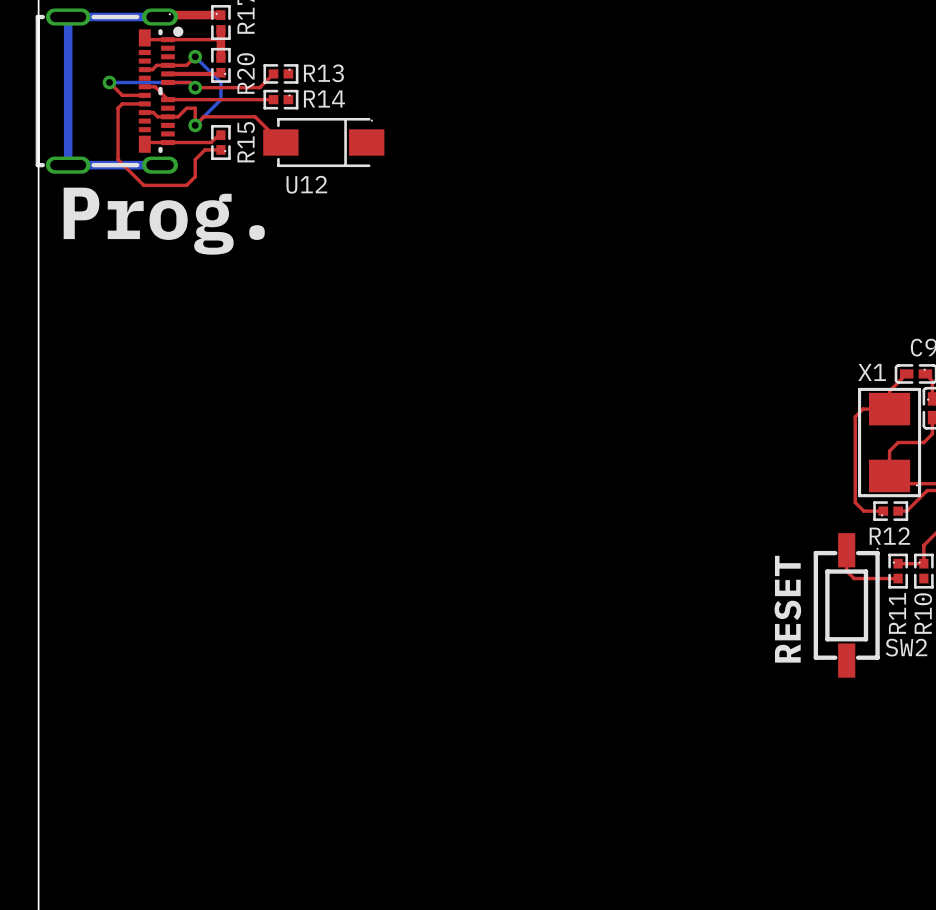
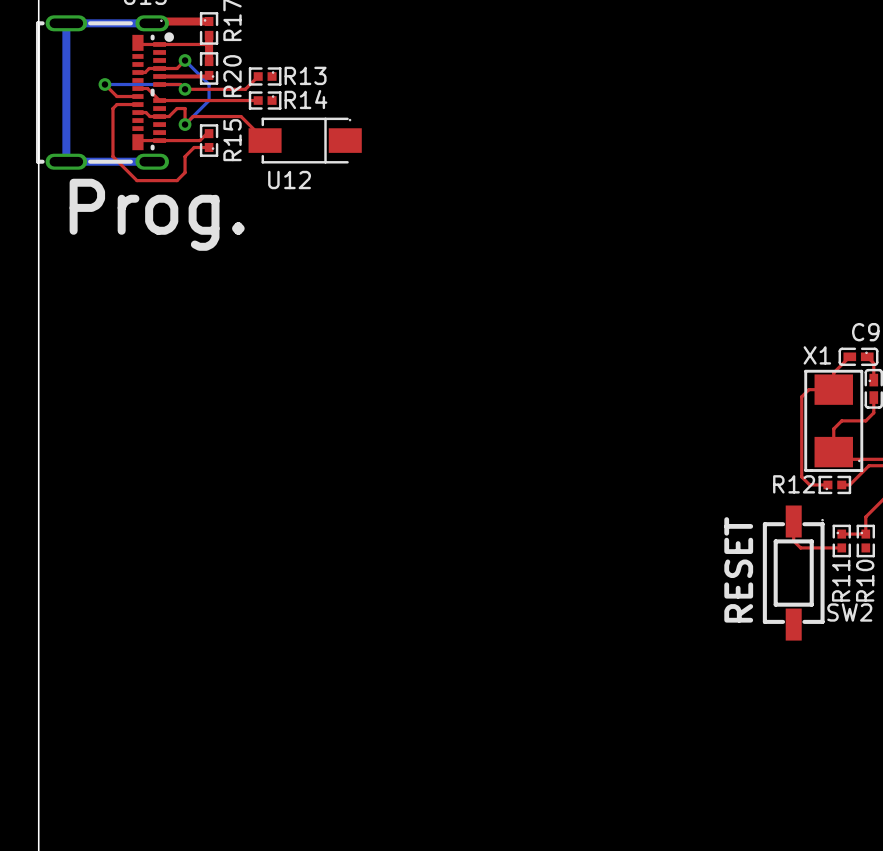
R12 name position: R12 (889, 536) -> R12 (794, 484)

